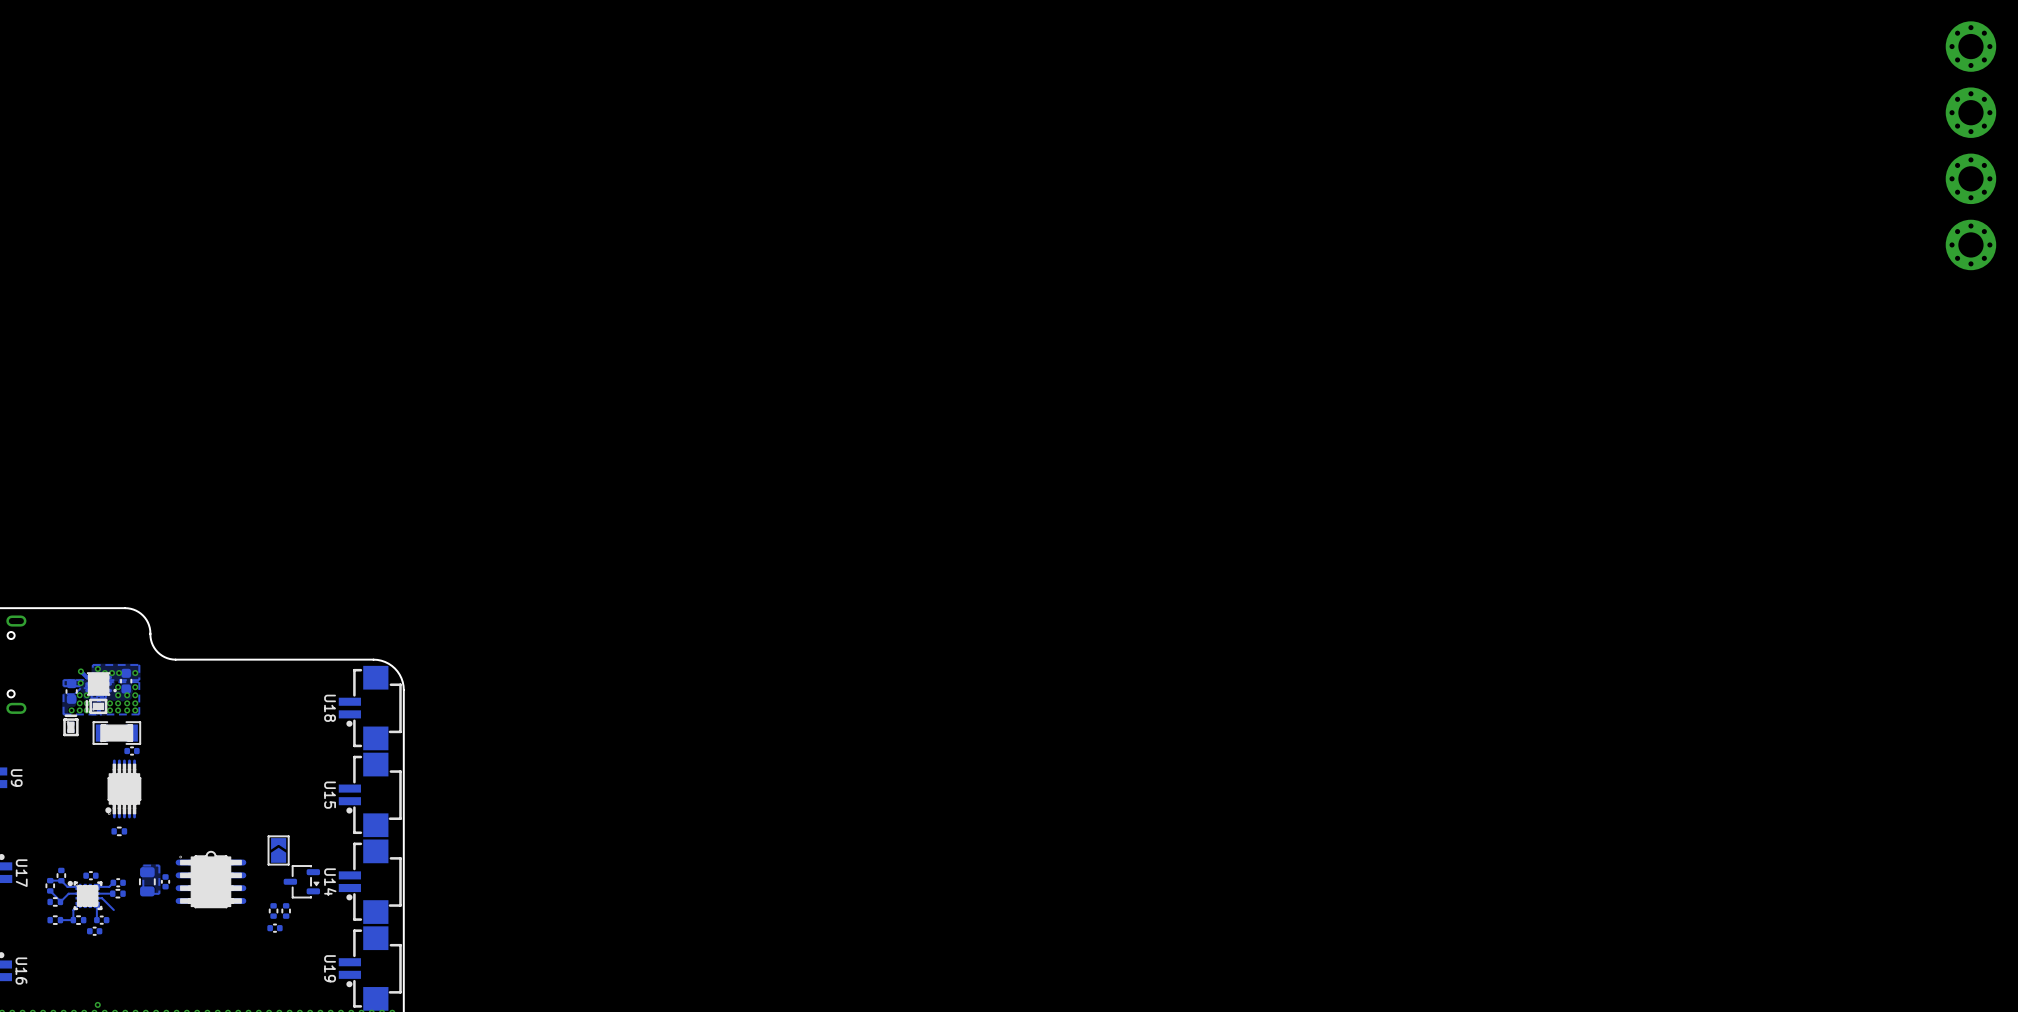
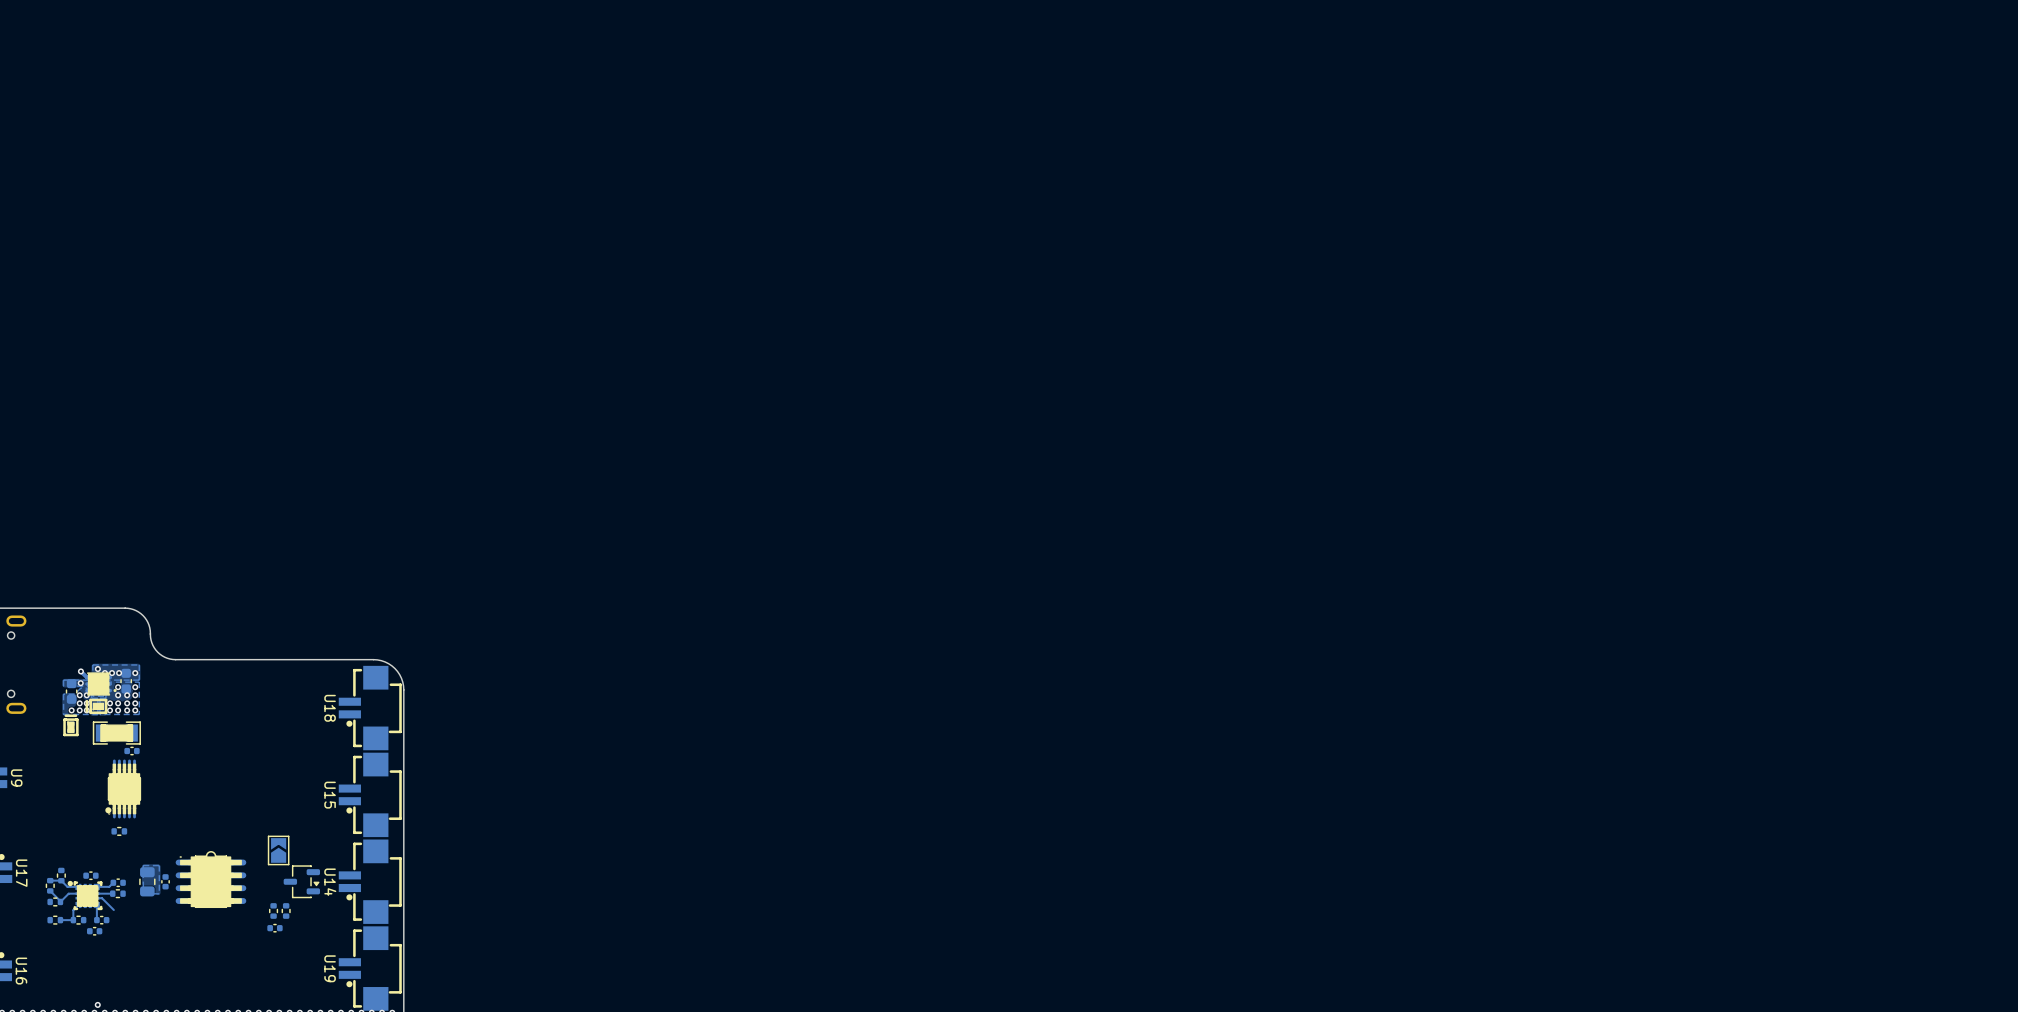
part: (1970, 46) -> none
part: (1970, 112) -> none
part: (1970, 178) -> none
part: (1970, 244) -> none

